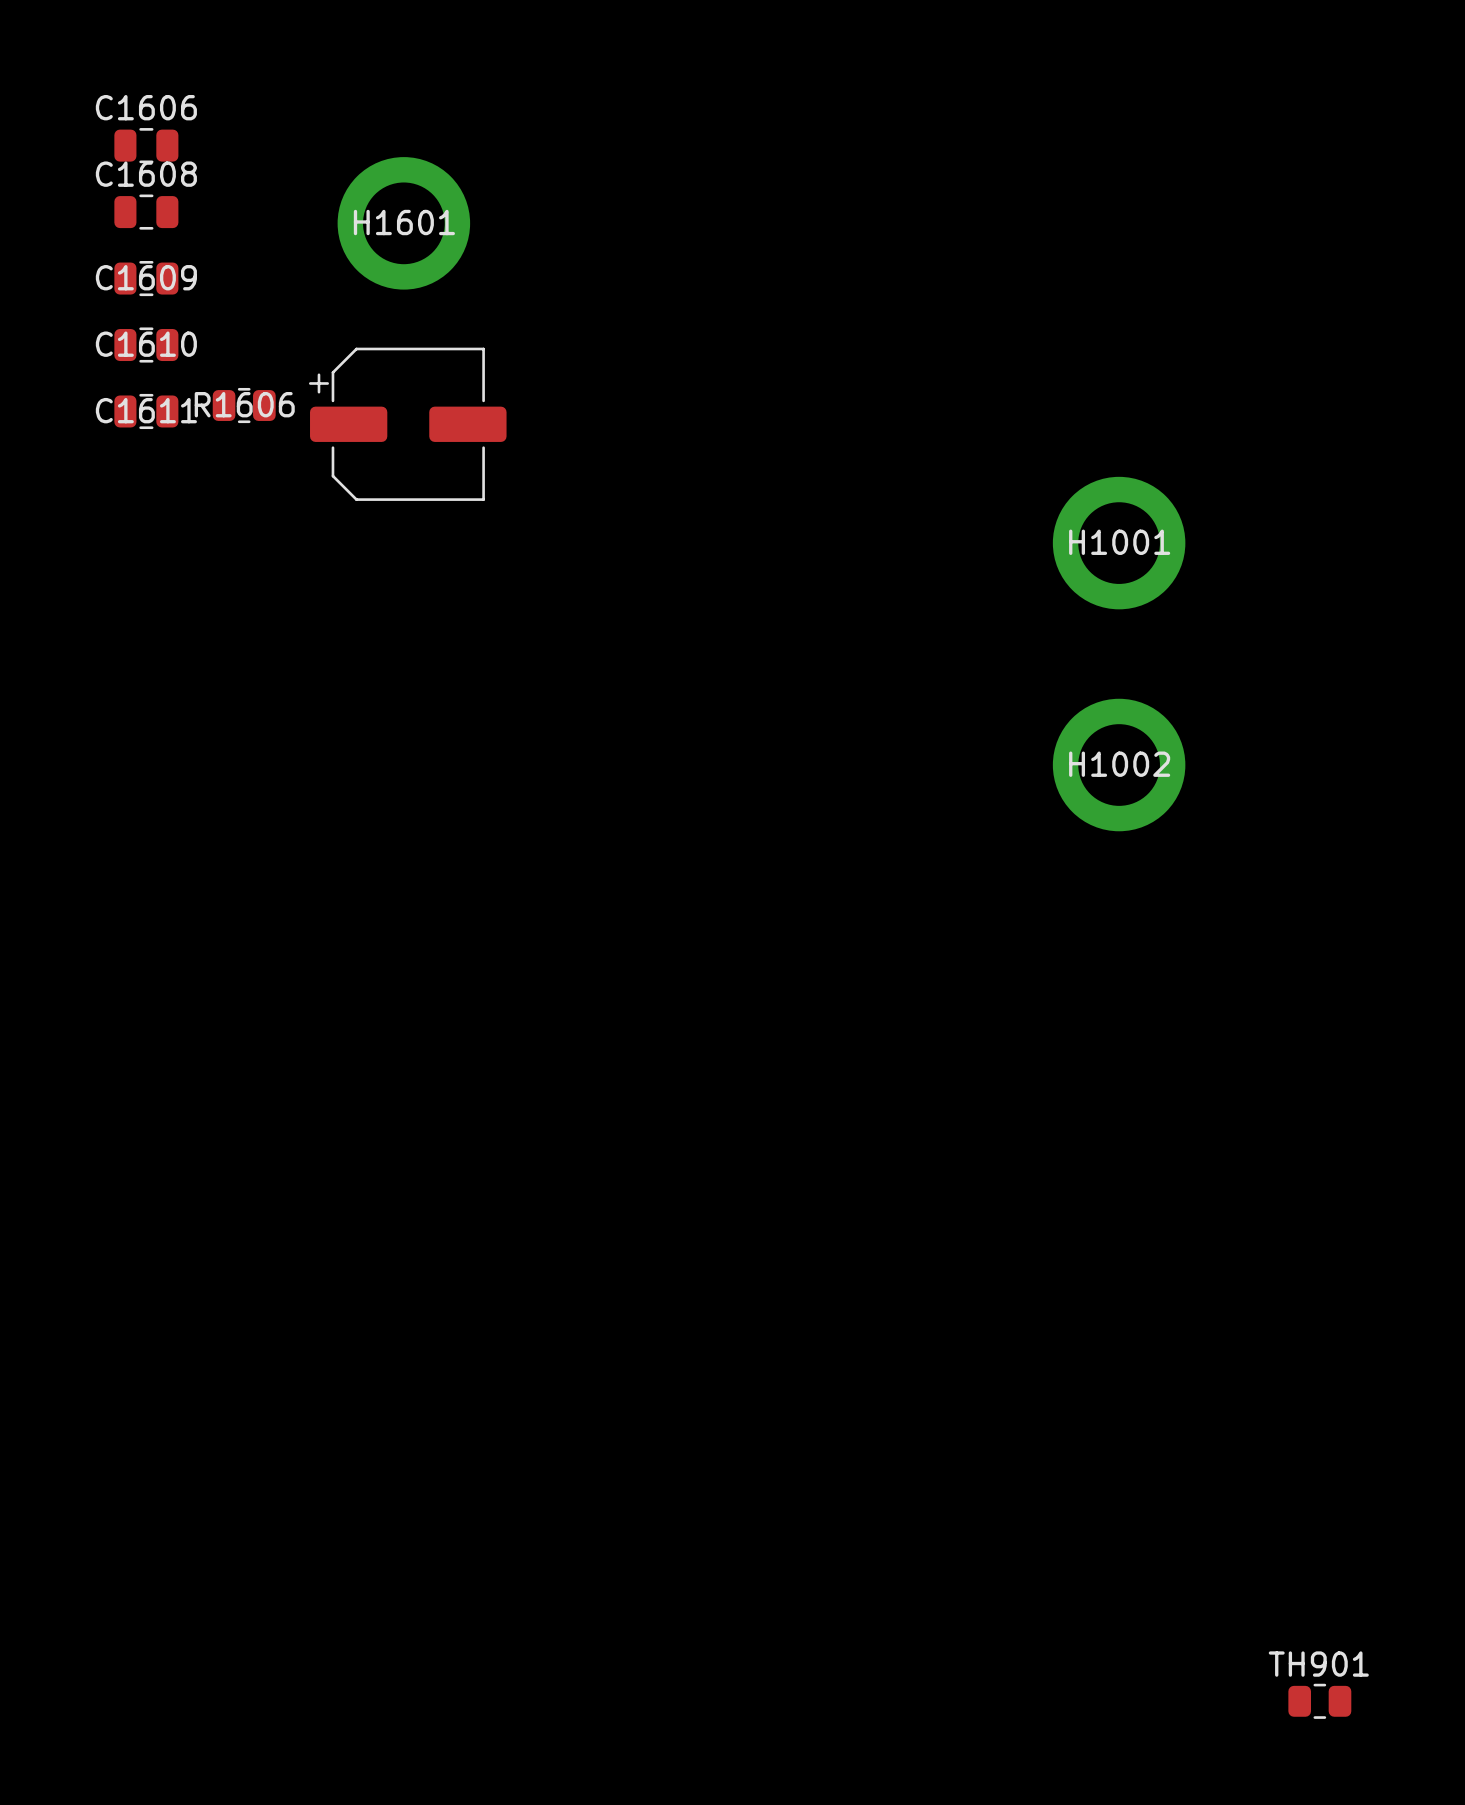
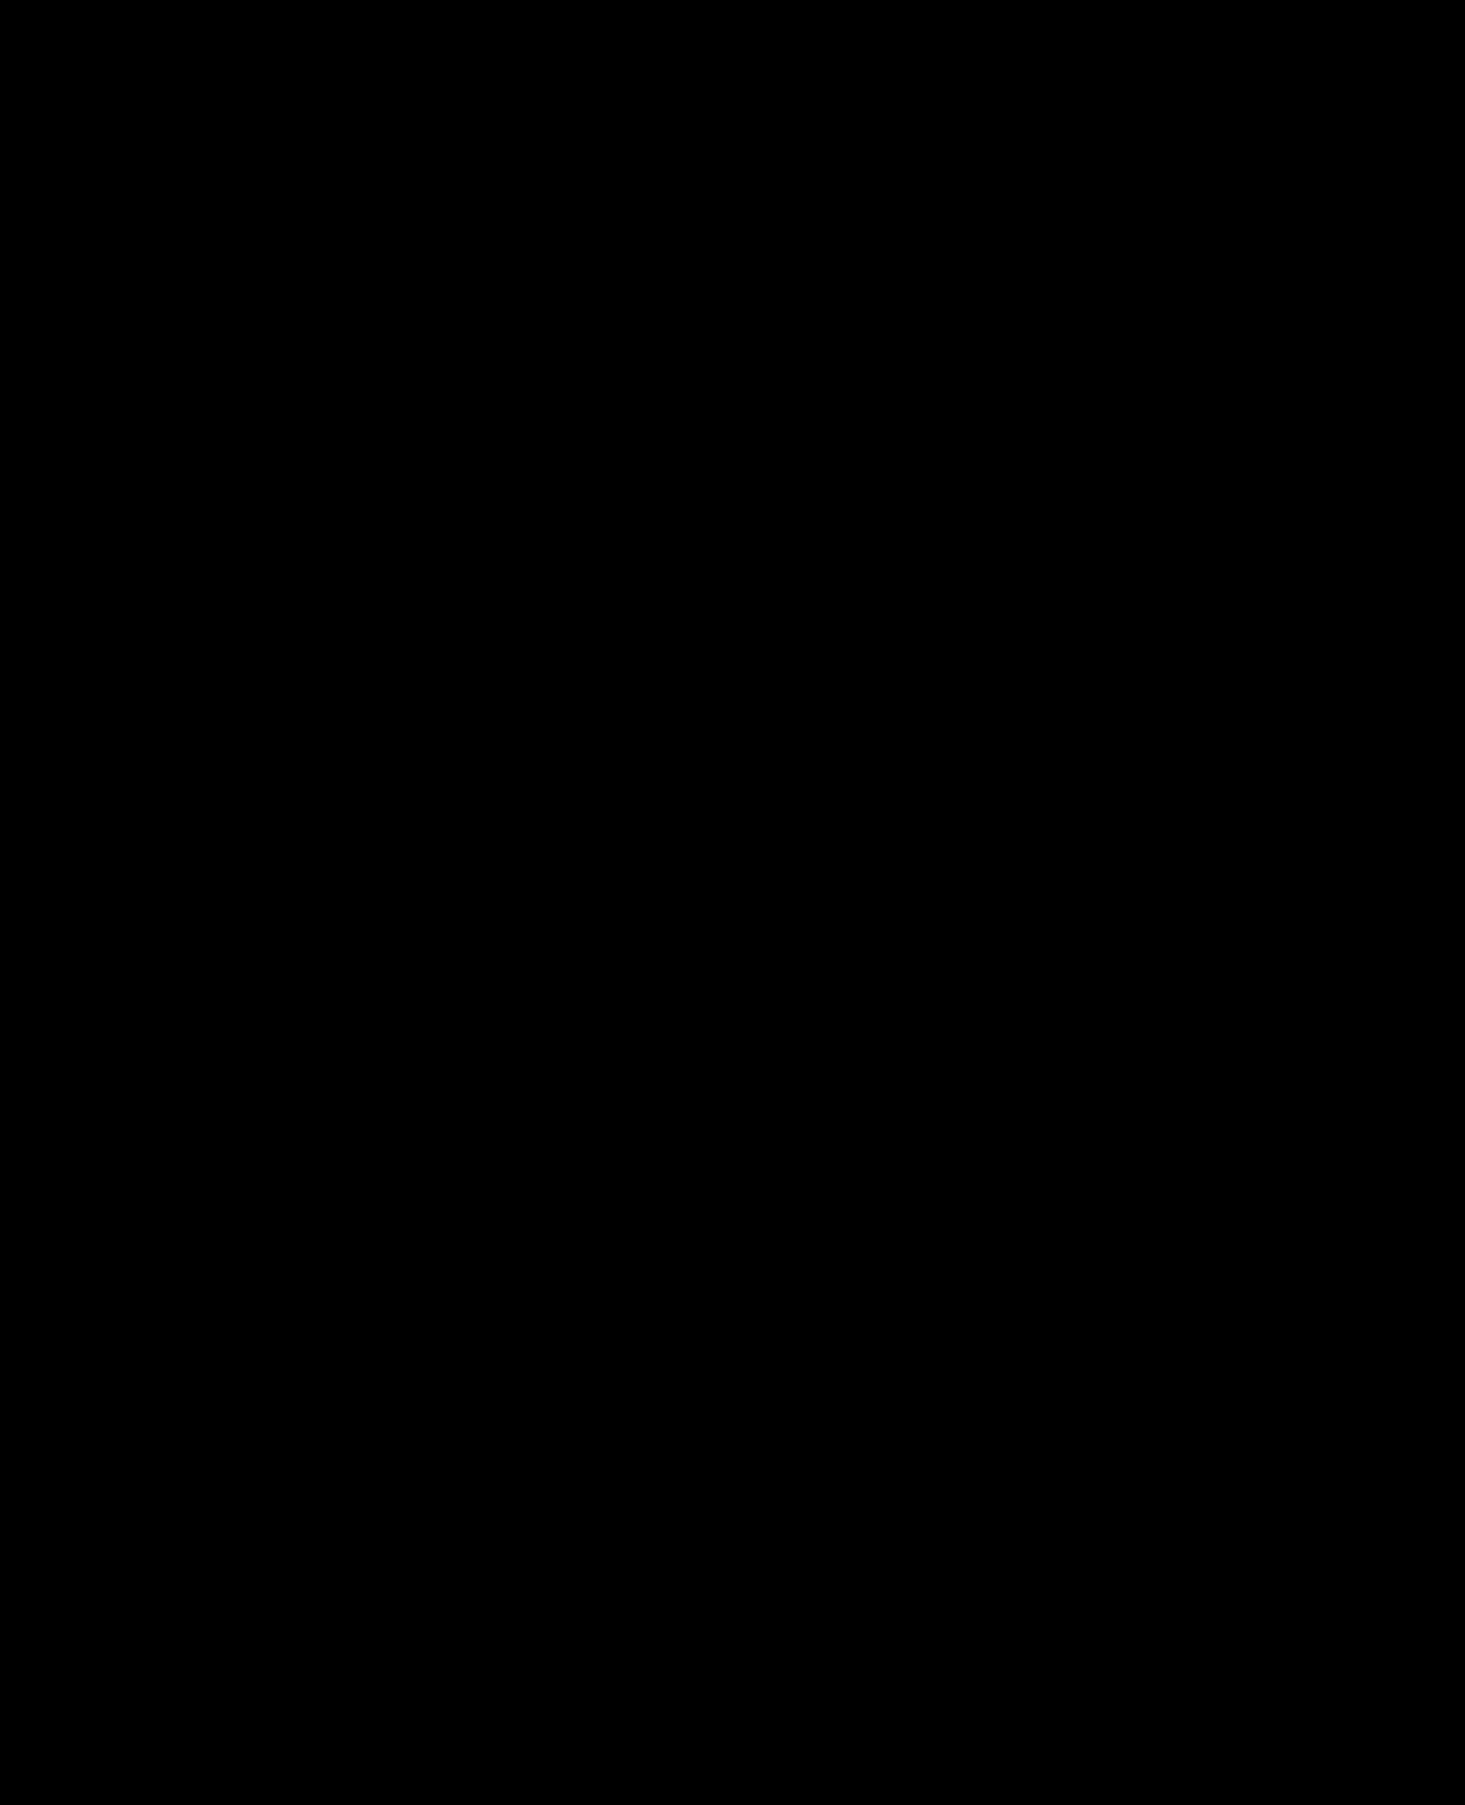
C1606: (146, 145) -> none
C1608: (146, 212) -> none
H1601: (405, 223) -> none
C1609: (146, 278) -> none
C1610: (146, 345) -> none
R1606: (244, 405) -> none
C1611: (146, 411) -> none
part: (407, 424) -> none
H1001: (1120, 543) -> none
H1002: (1120, 765) -> none
TH901: (1319, 1701) -> none

